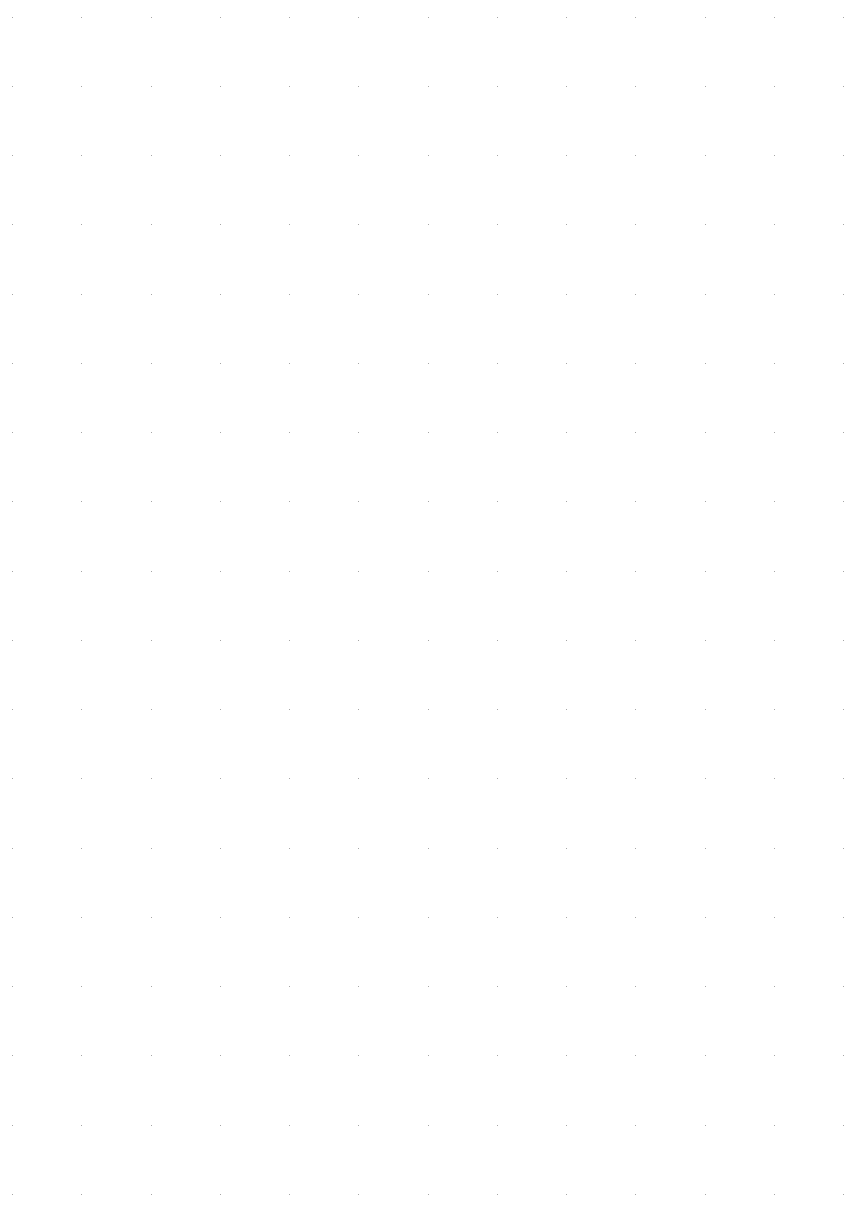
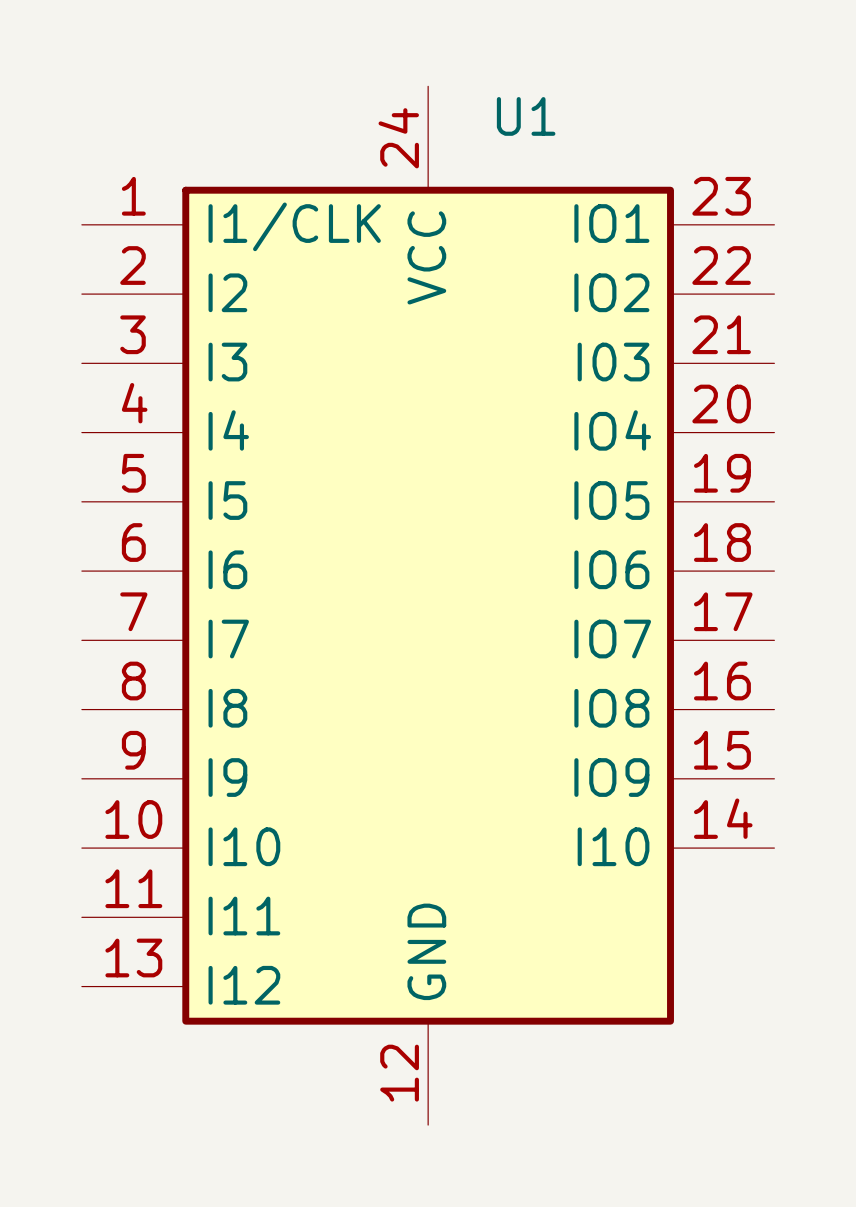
U1: none -> (428, 605)

